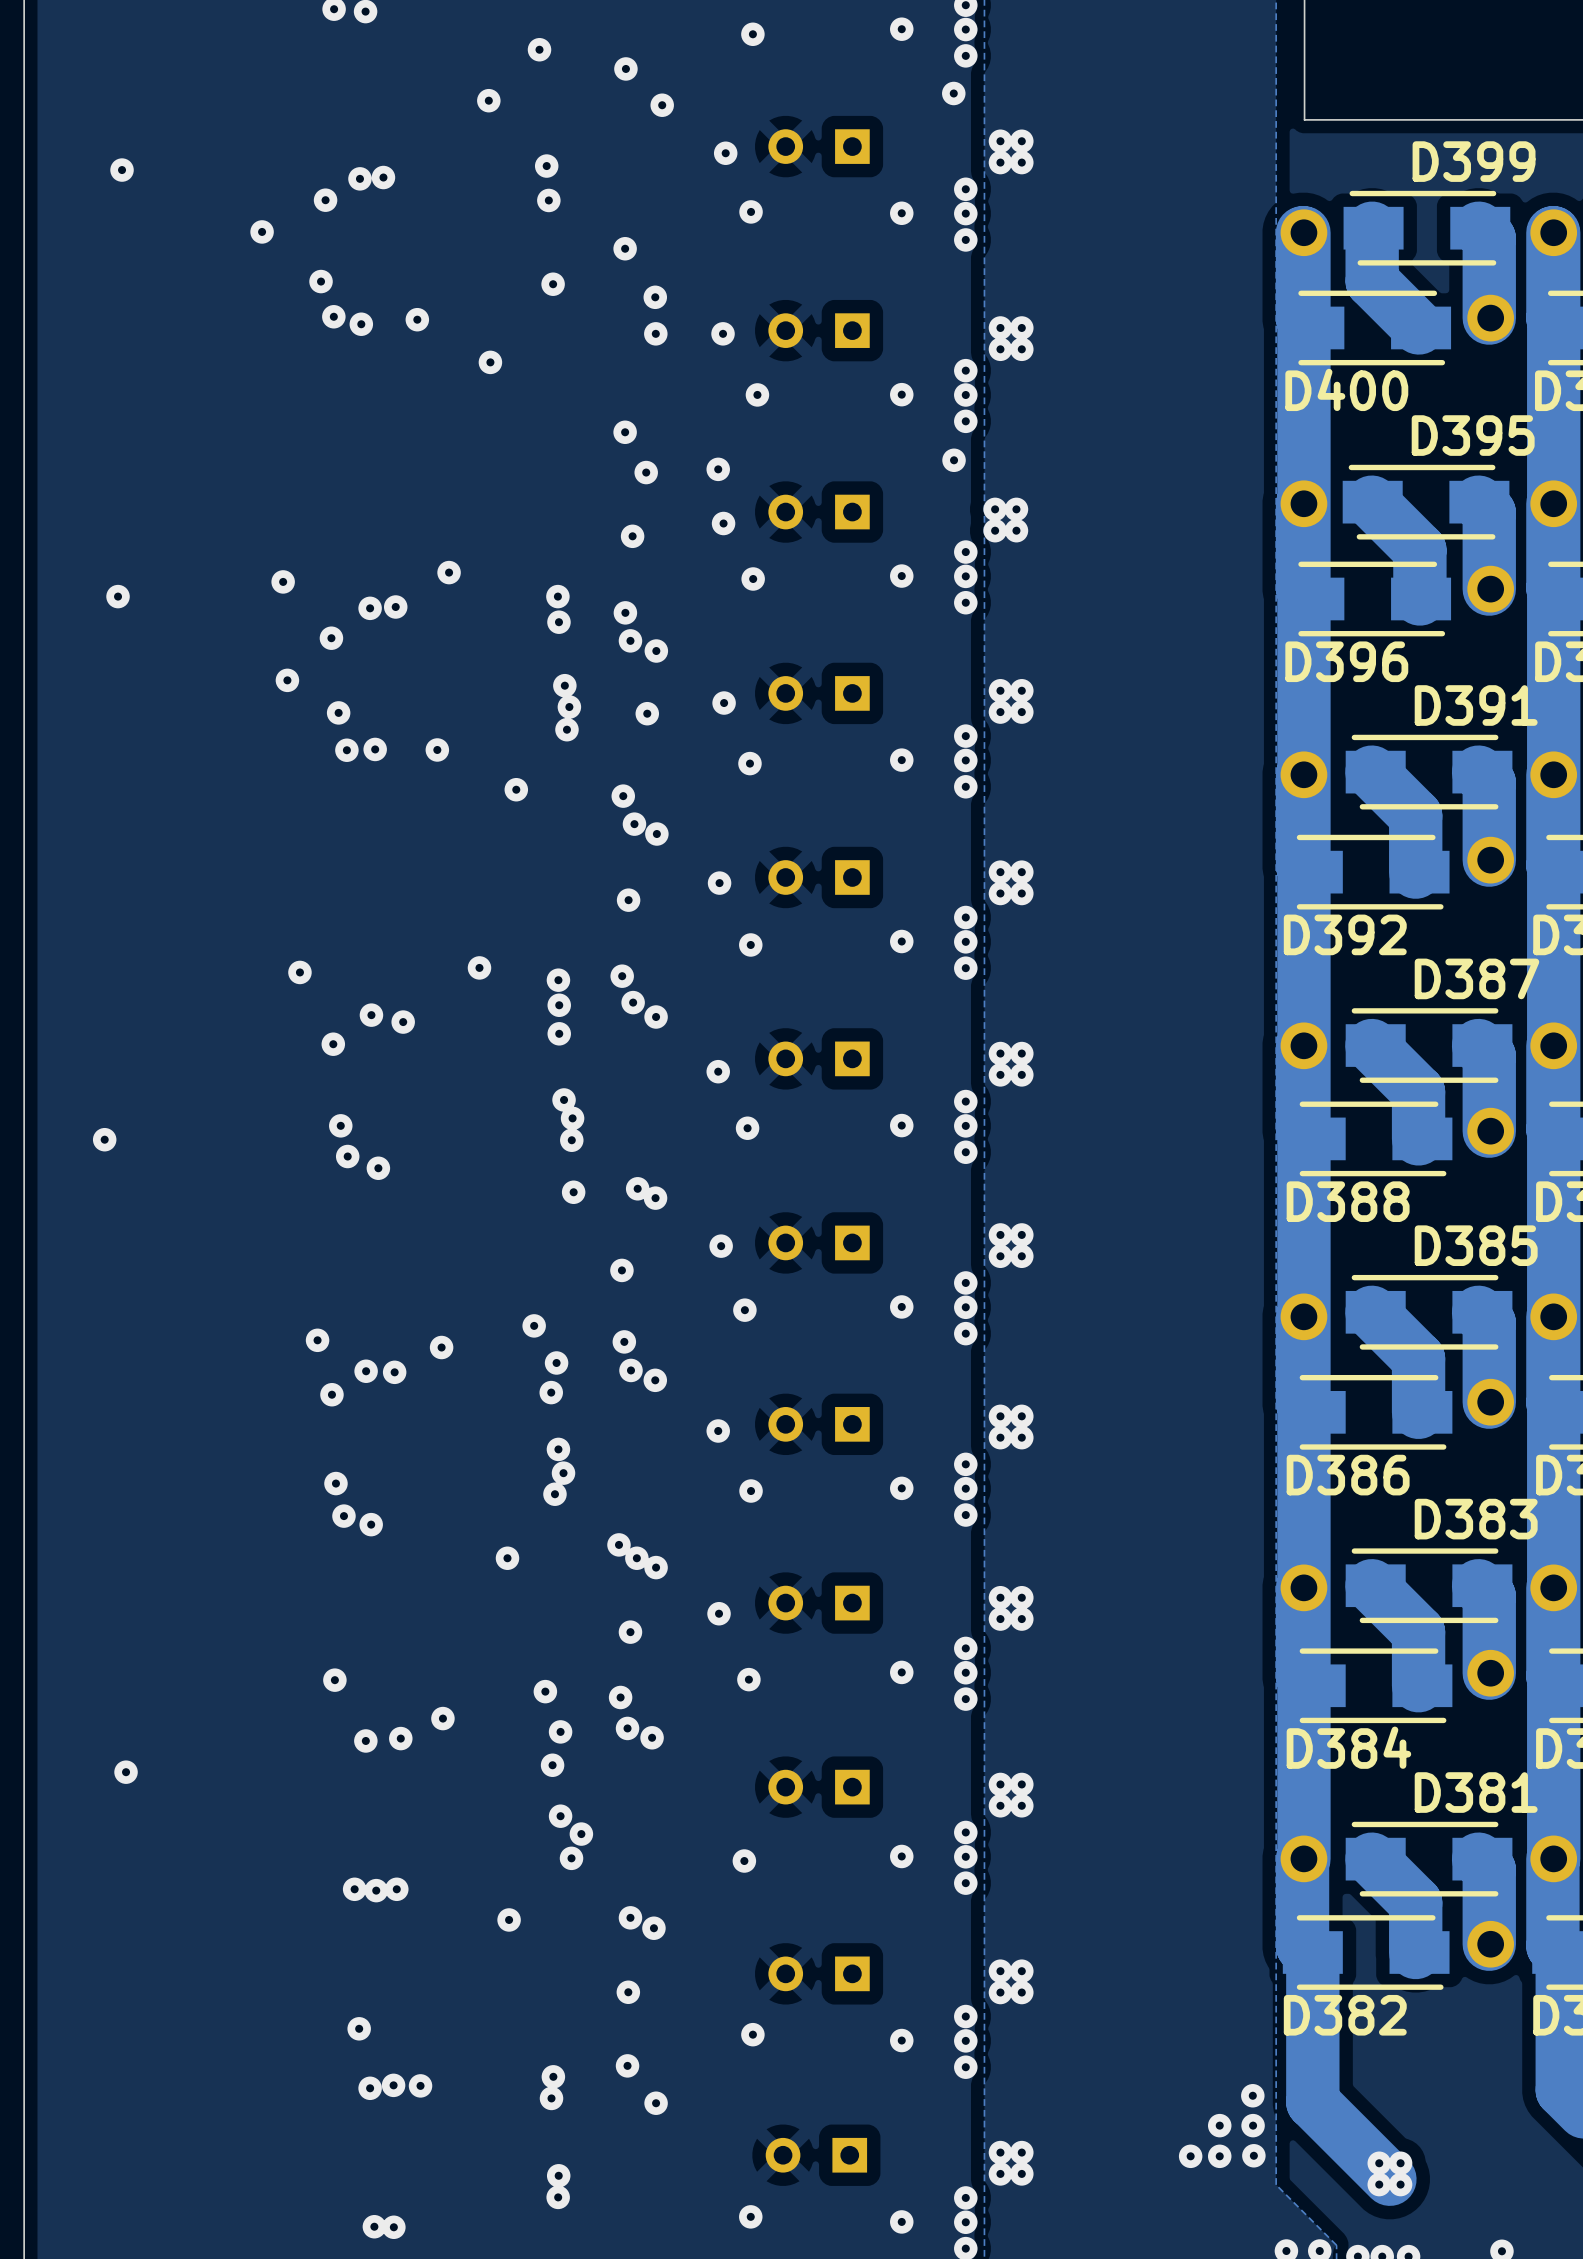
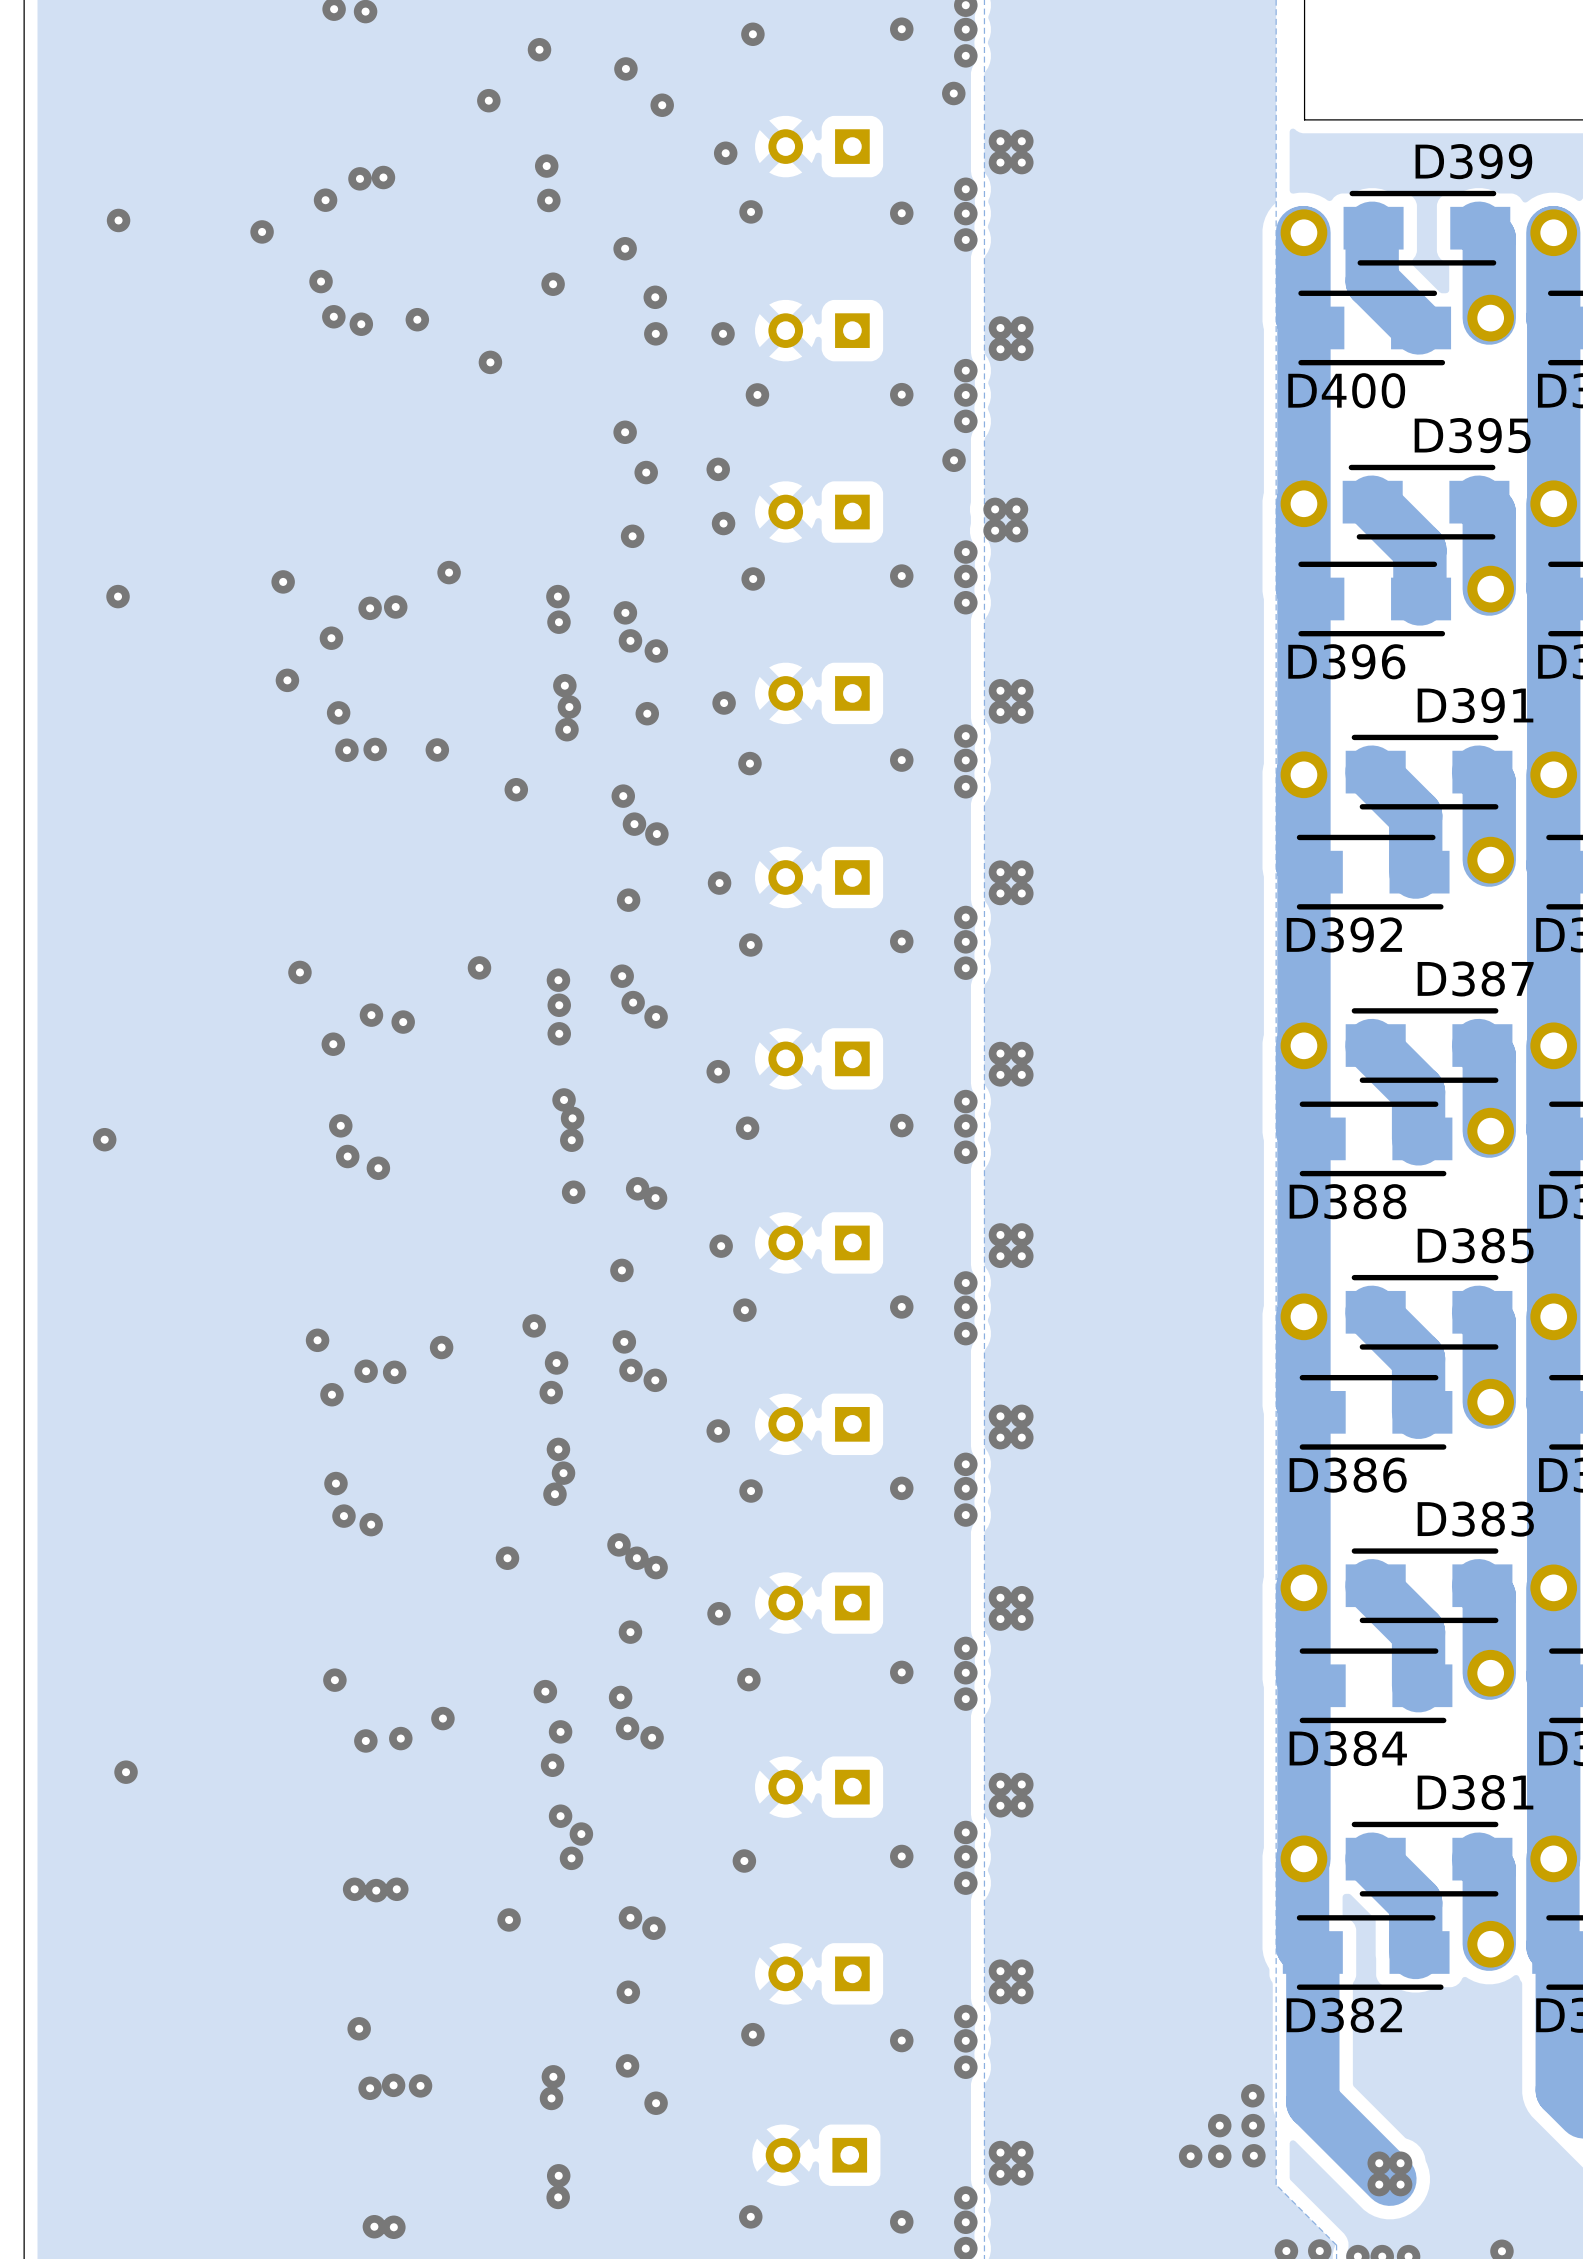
via position: (122, 170) -> (118, 220)

